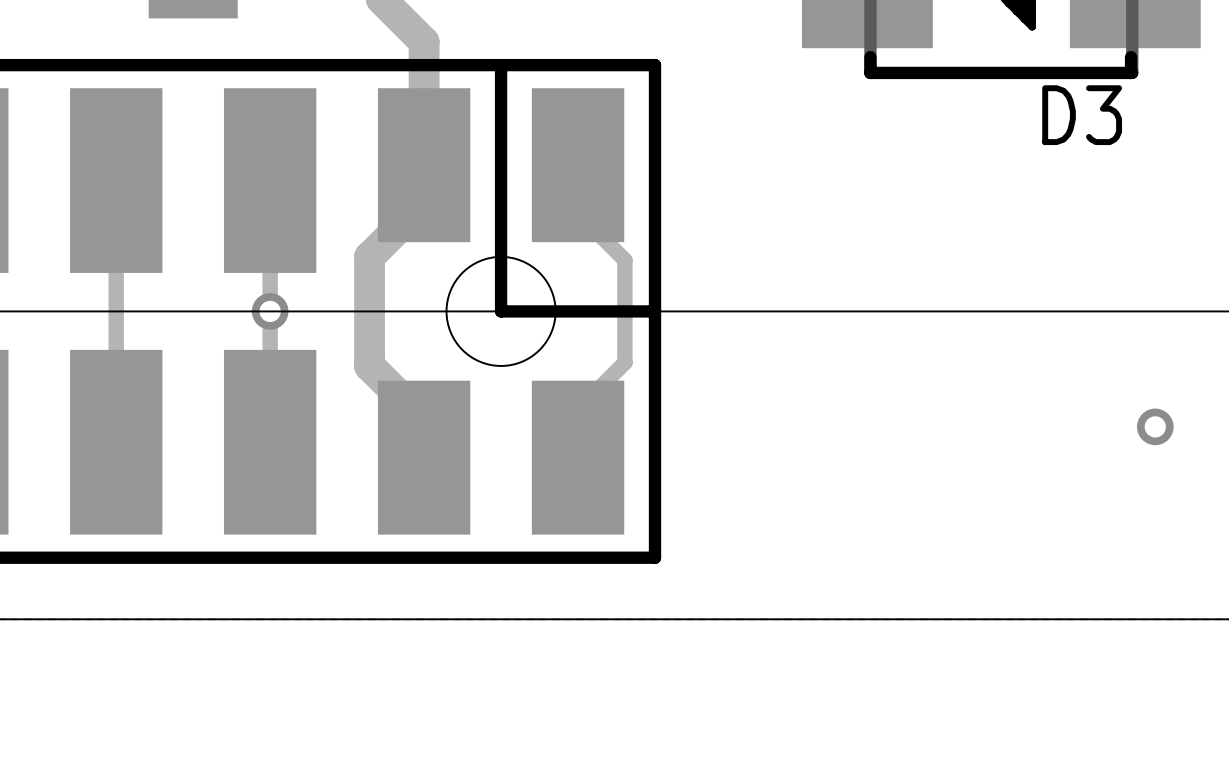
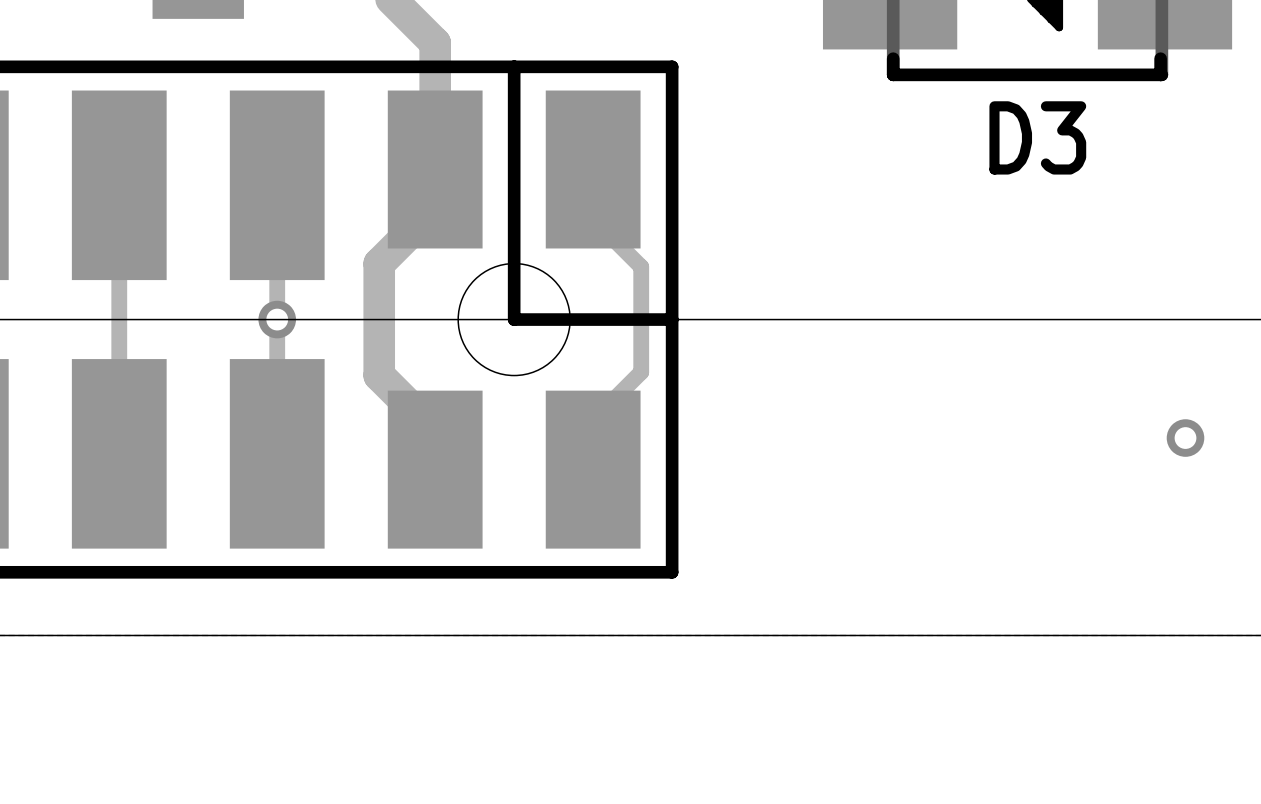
D3 name position: D3 (1082, 115) -> D3 (1037, 137)

